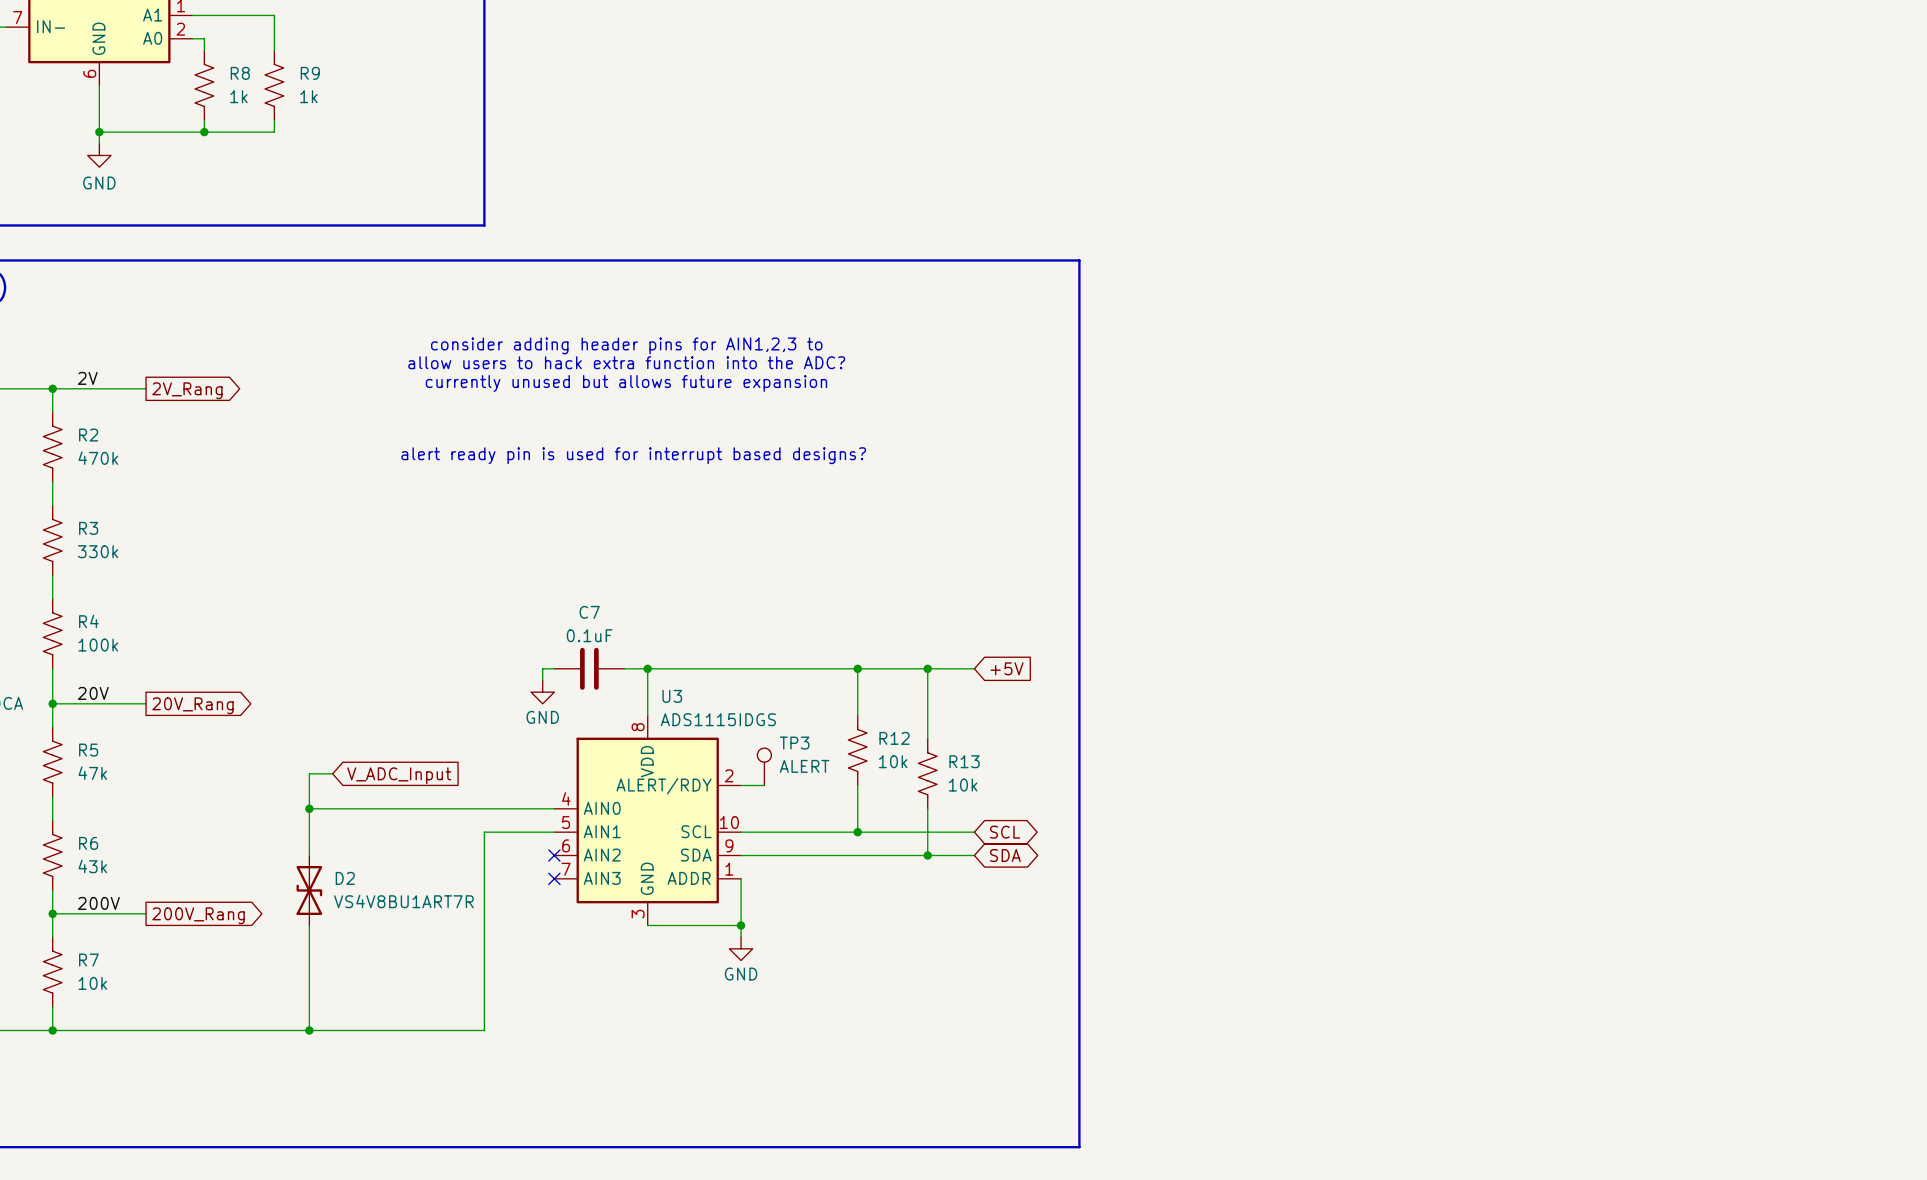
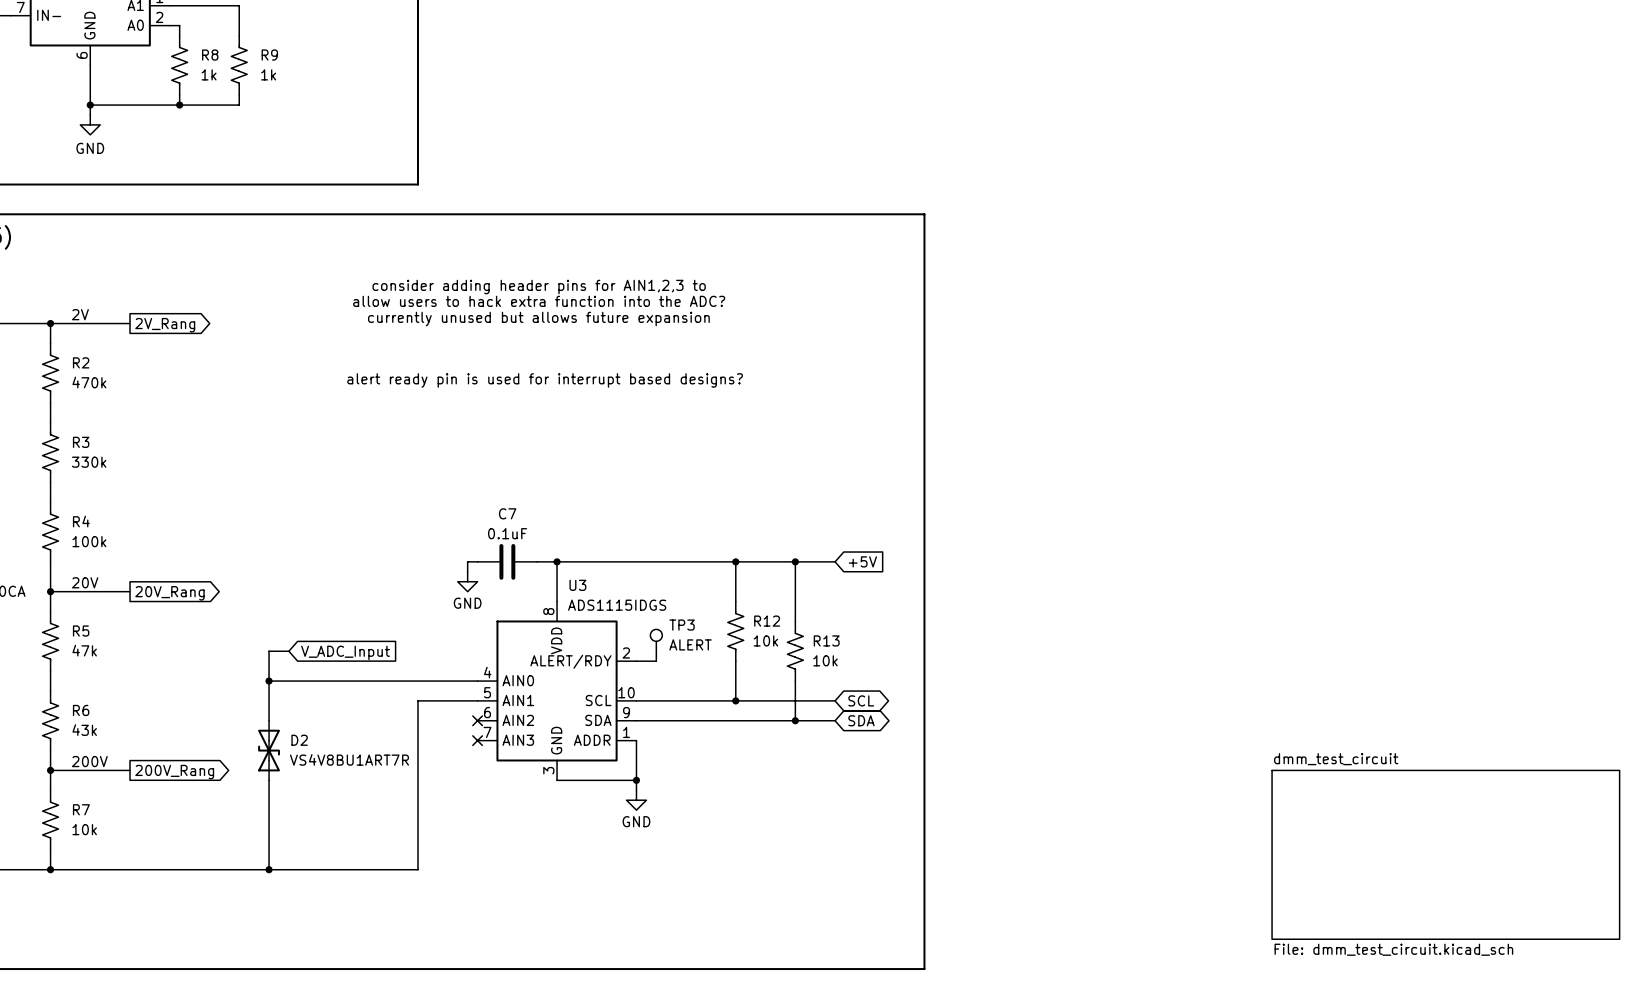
sheet dmm_test_circuit: none -> File: dmm_test_circuit.kicad_sch (1445, 854)

